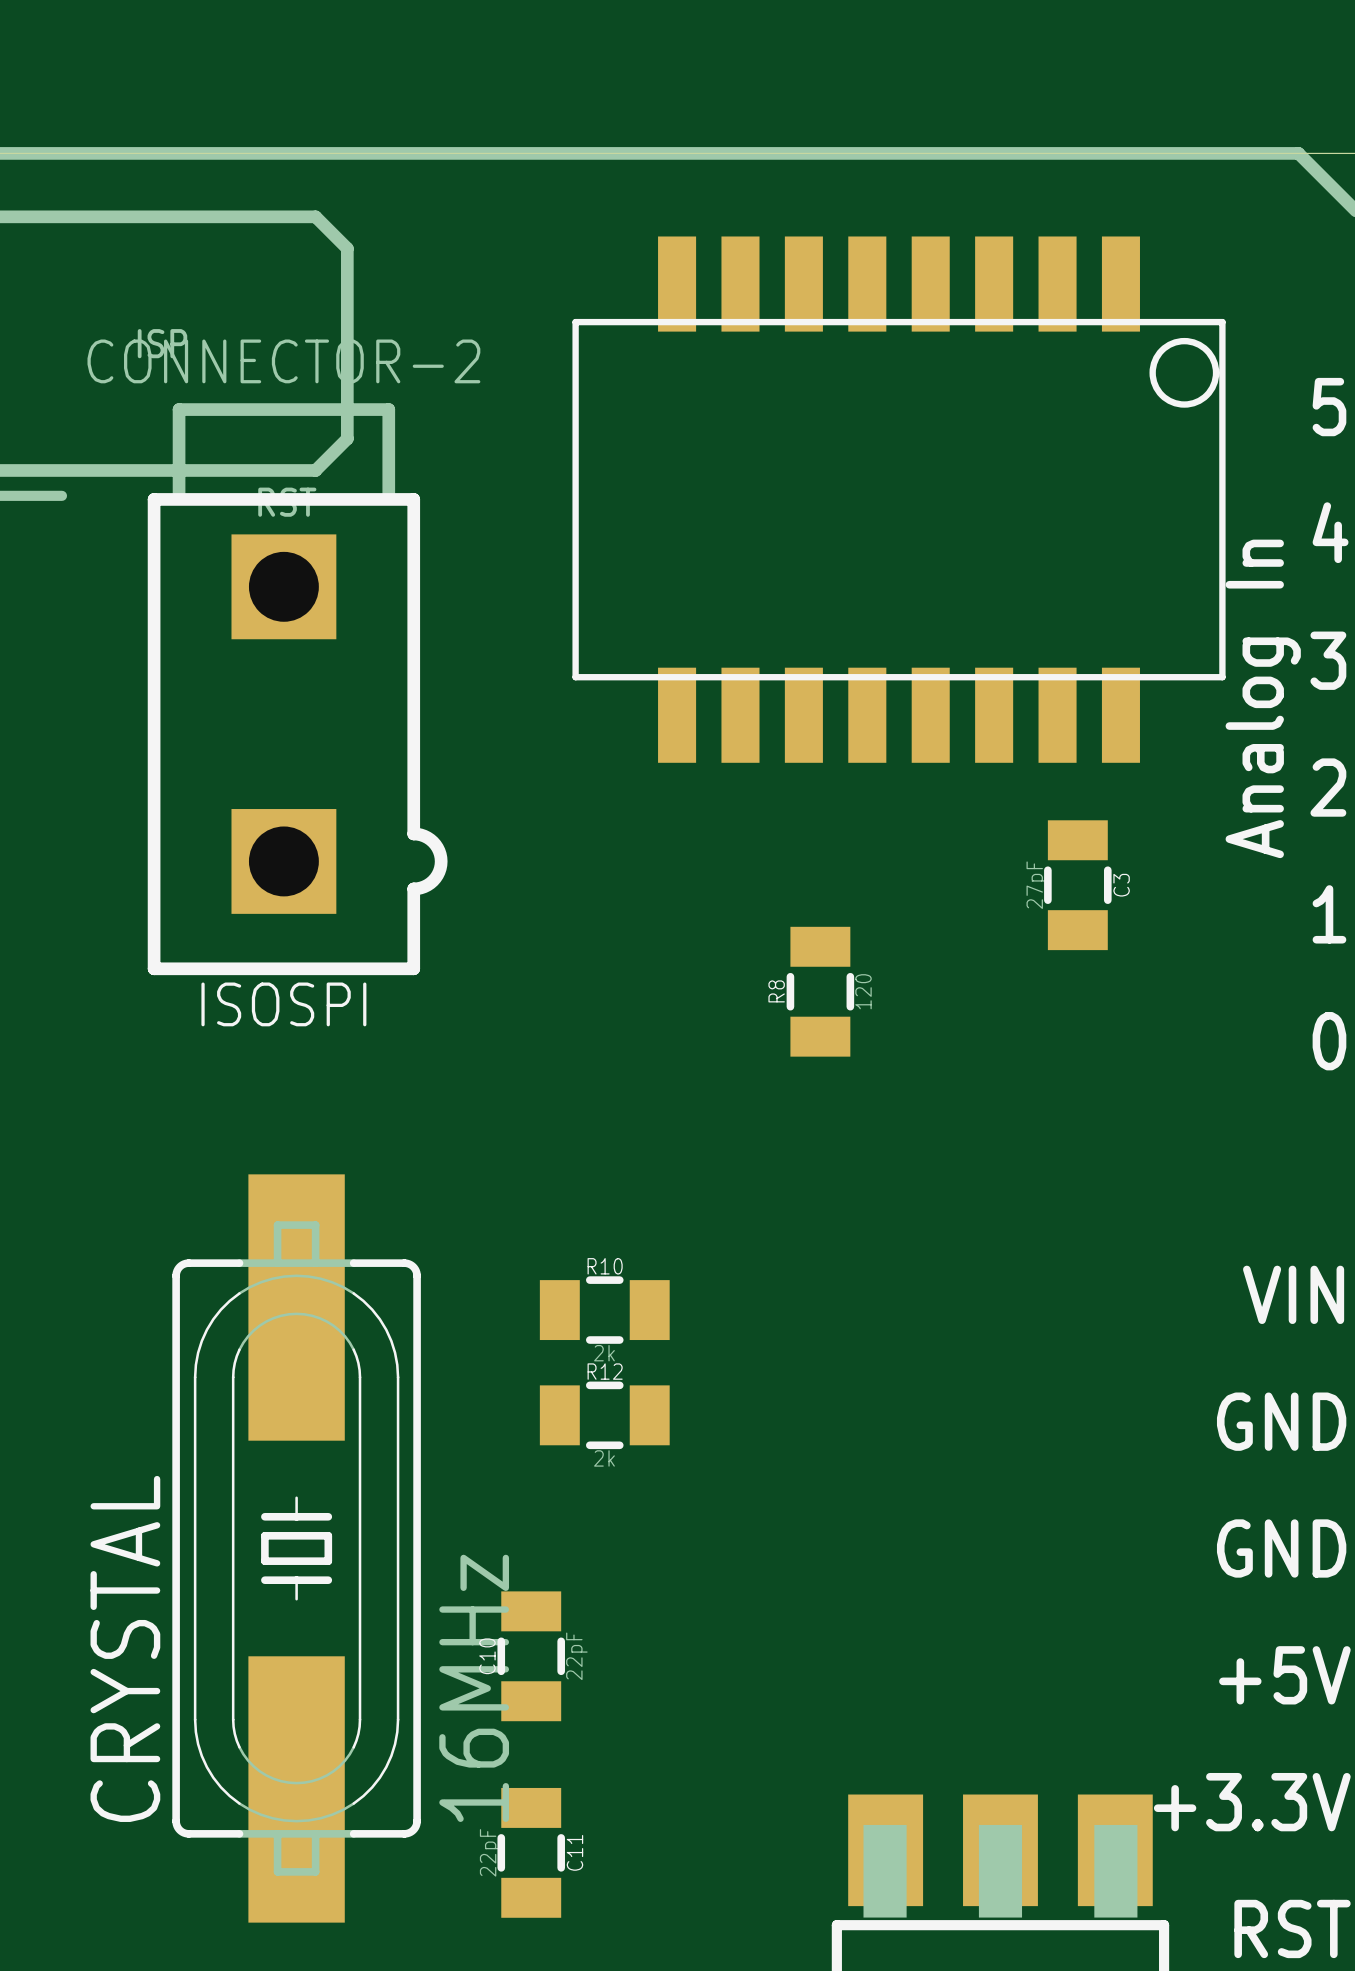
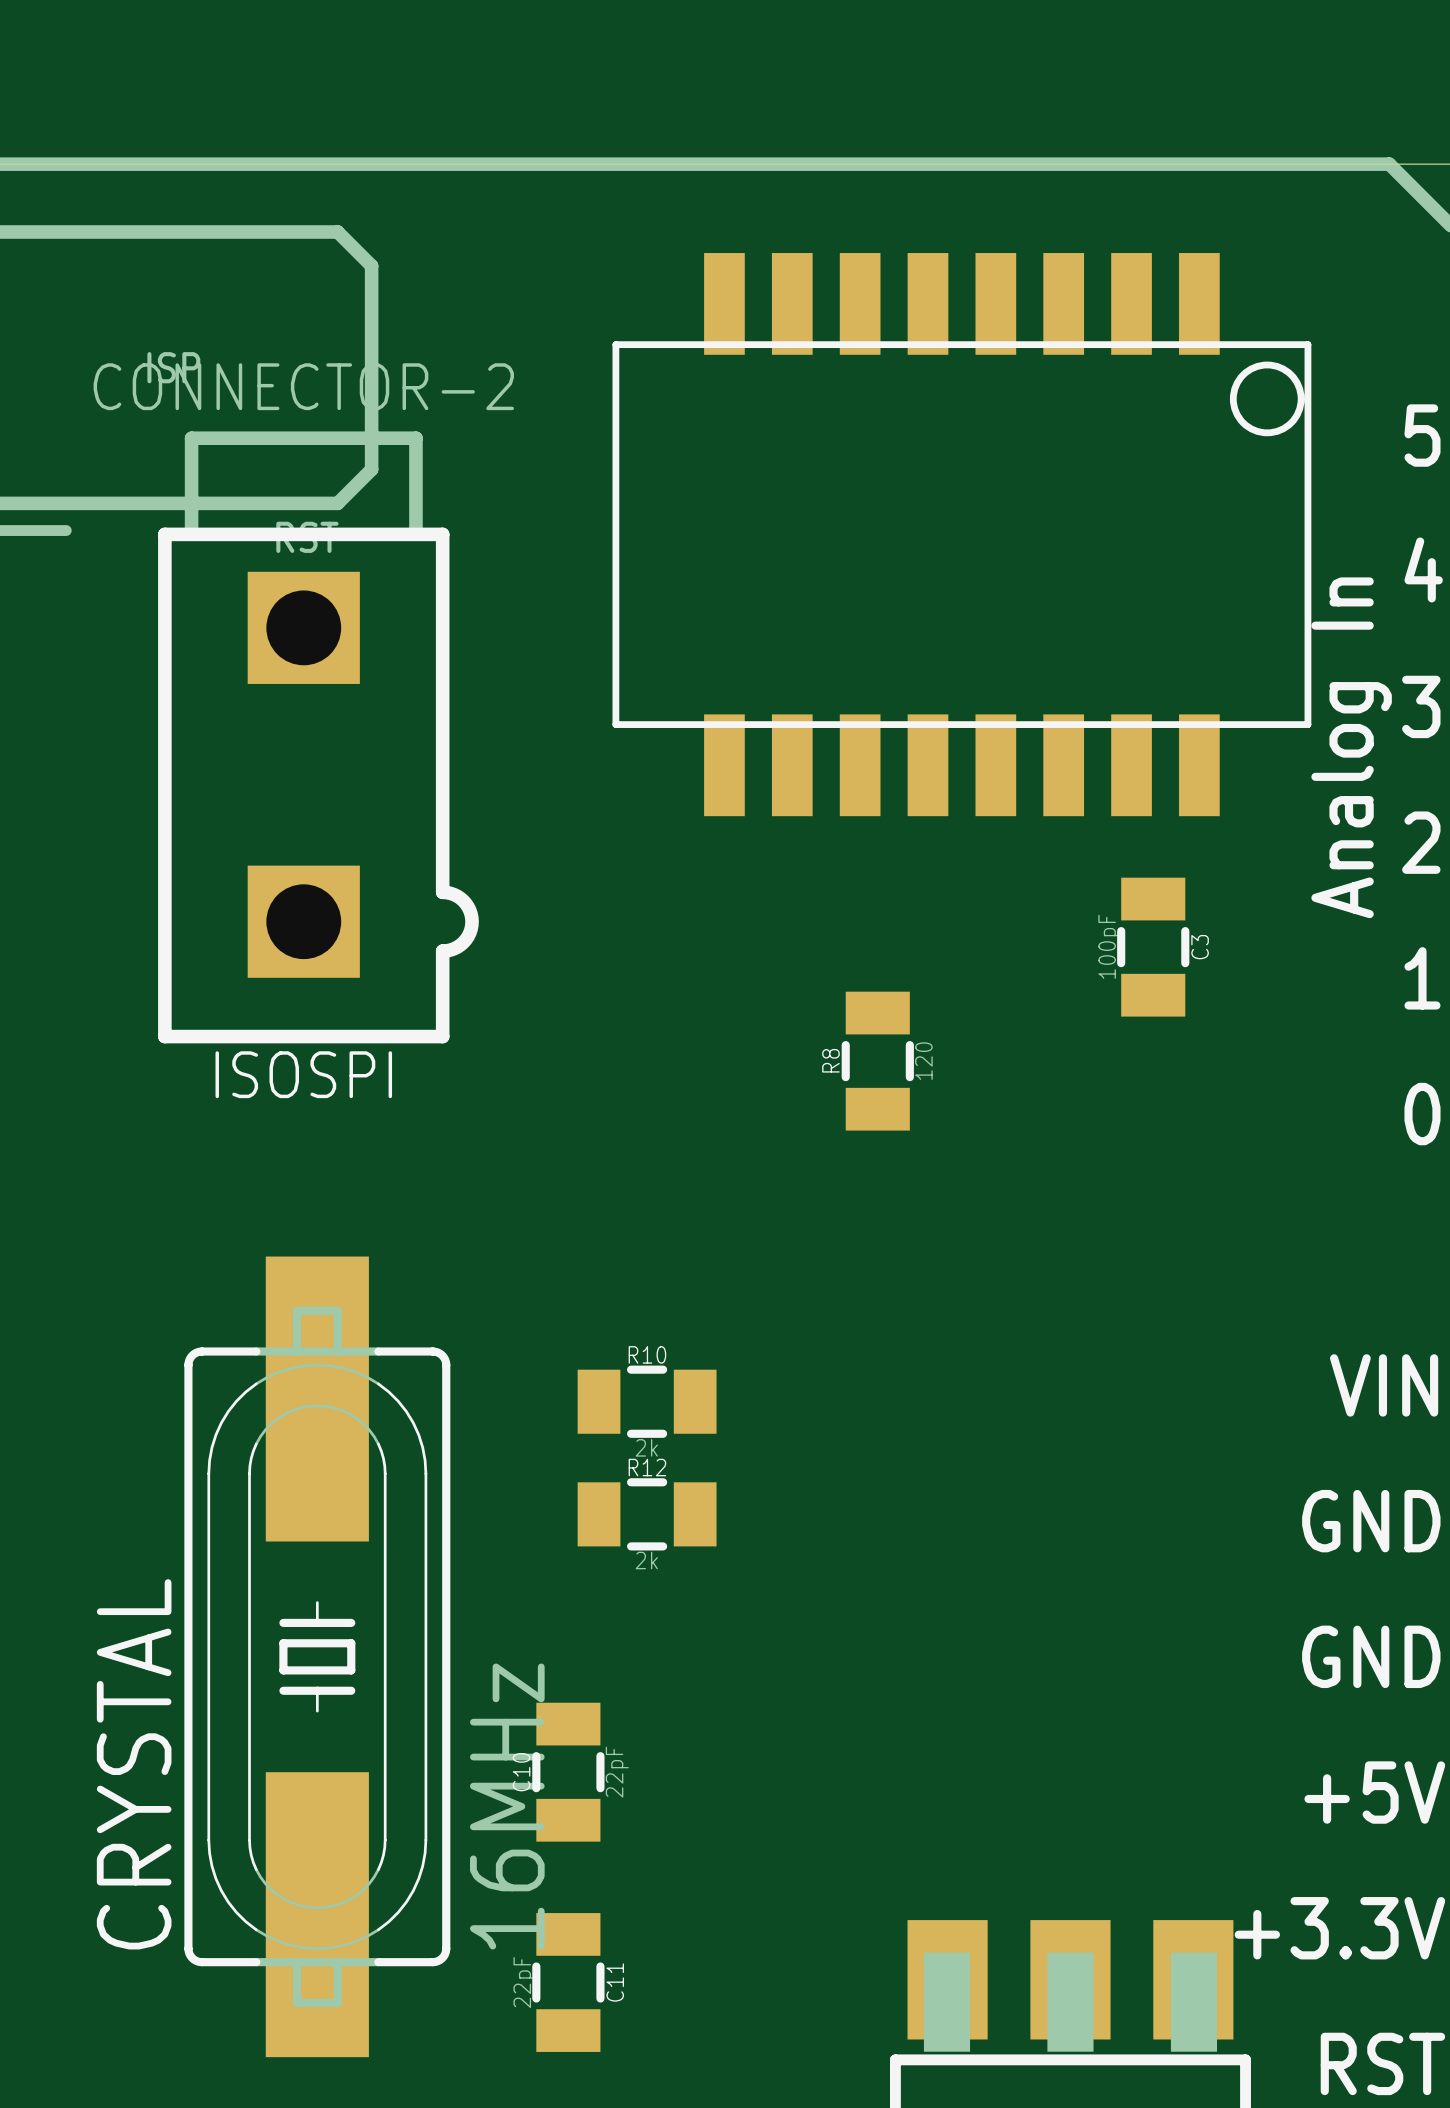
C3 value: 27pF (1037, 885) -> 100pF (1109, 946)

